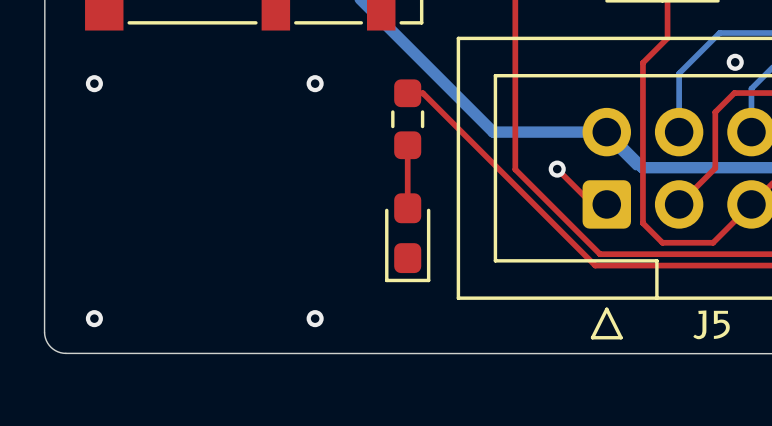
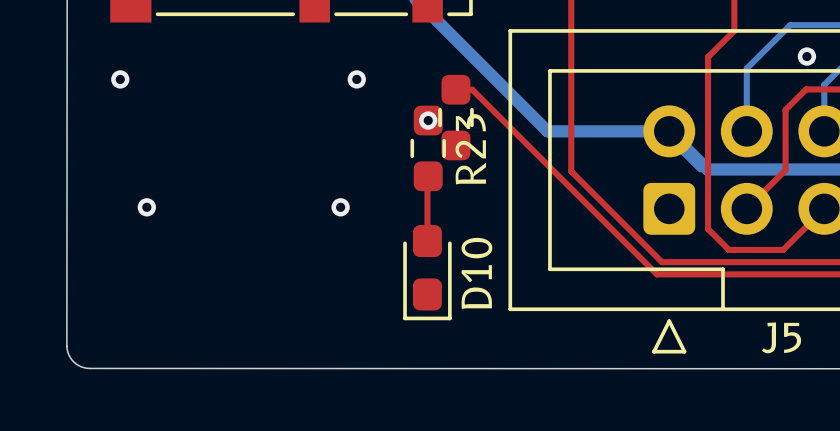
via: none -> (428, 120)
top track: (407, 145) (407, 208) -> none
R23: none -> (428, 148)
top track: (557, 169) (592, 204) (606, 204) -> none
via: (557, 169) -> none
top track: none -> (428, 176) (427, 241)
via: none -> (146, 207)
via: none -> (340, 207)
part: (407, 237) -> none
D10: none -> (427, 272)
via: (94, 318) -> none
via: (315, 318) -> none

